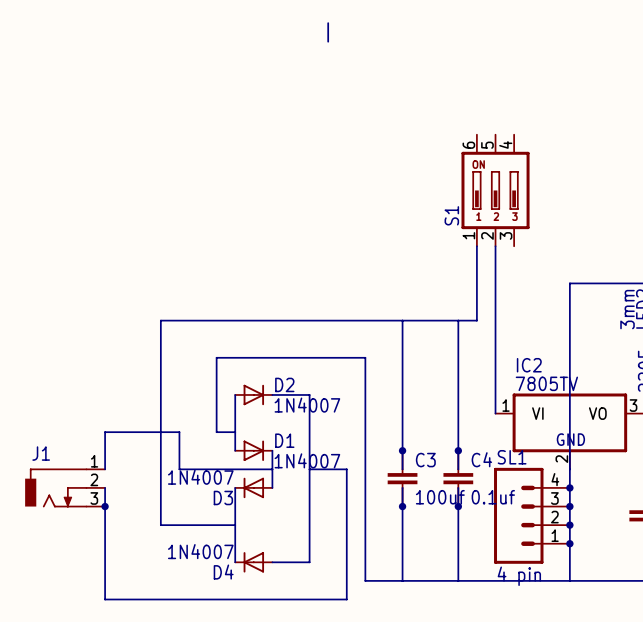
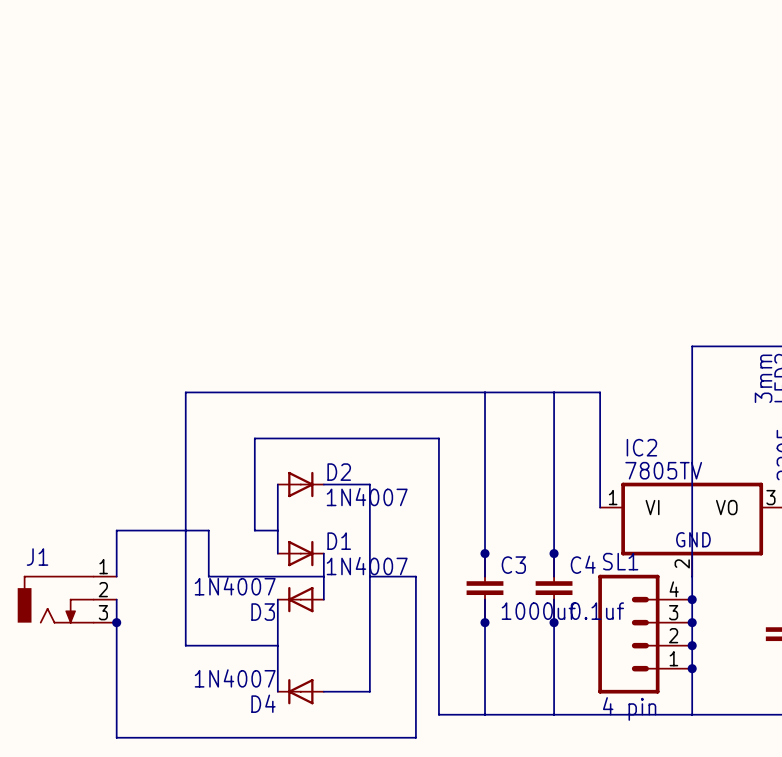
wire: (328, 23) (328, 41) -> none
S1: (495, 190) -> none
wire: (476, 246) (476, 320) -> (600, 392) (577, 392)
wire: (495, 246) (495, 320) -> none
C3 value: 100uf (440, 497) -> 1000uf (538, 611)

